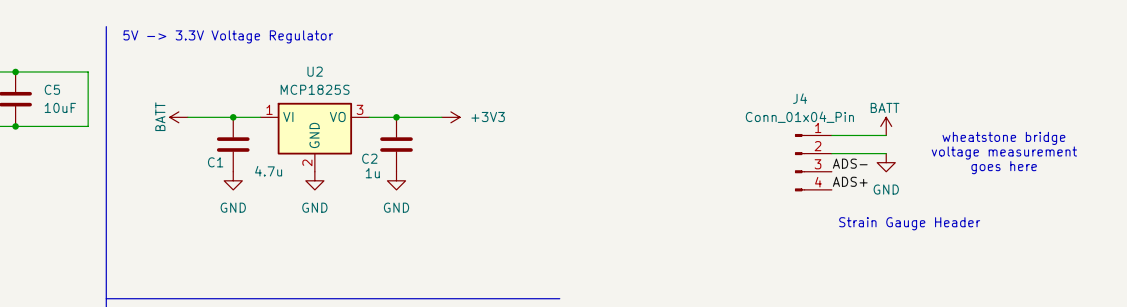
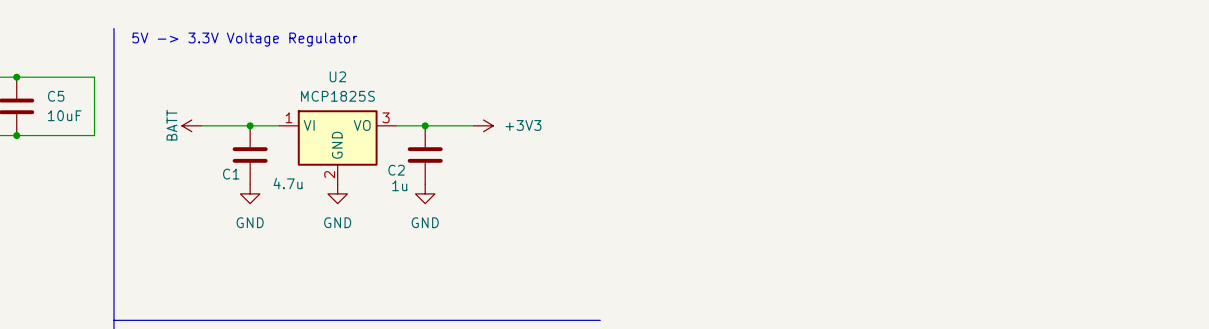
power symbol: BATT (886, 126) -> none
wire: (831, 135) (886, 135) -> none
text: wheatstone bridge (1003, 138) -> none
wire: (831, 153) (886, 153) -> none
text: voltage measurement (1004, 153) -> none
J4: Conn_01x04_Pin (813, 162) -> none
power symbol: GND (886, 162) -> none
label: ADS- (850, 163) -> none
text: goes here (1004, 167) -> none
label: ADS+ (850, 181) -> none
text: Strain Gauge Header (909, 223) -> none

